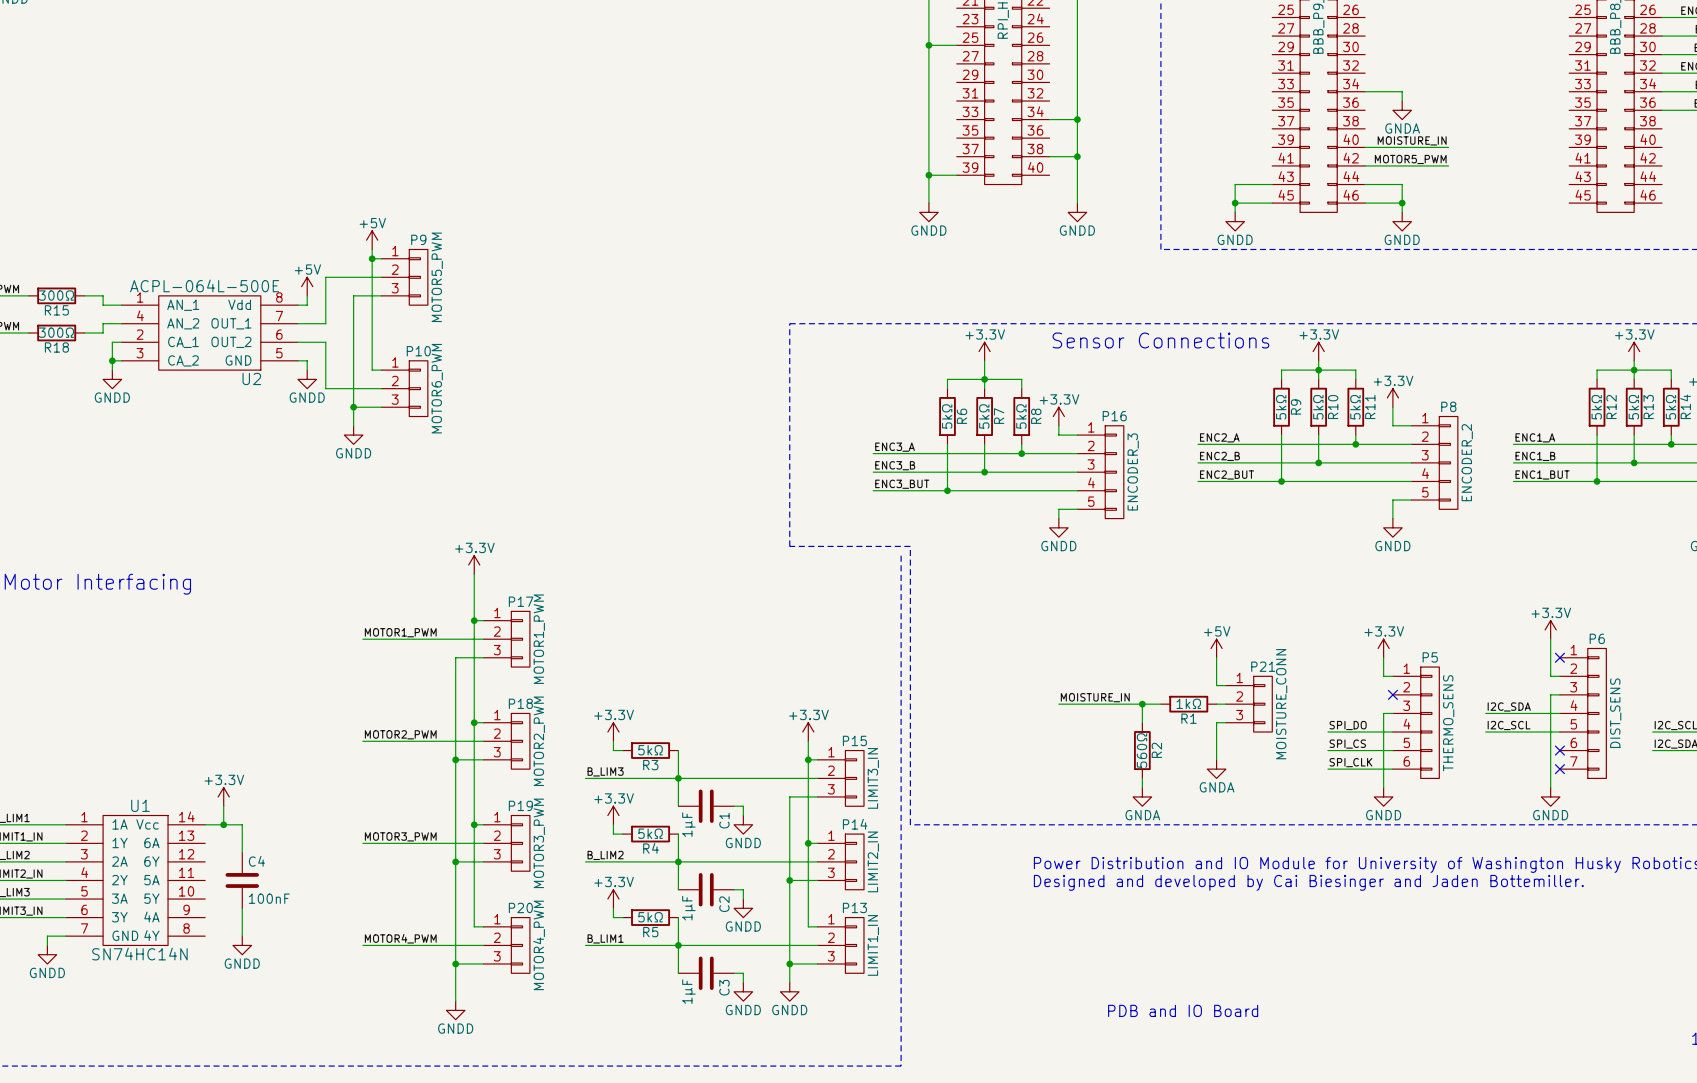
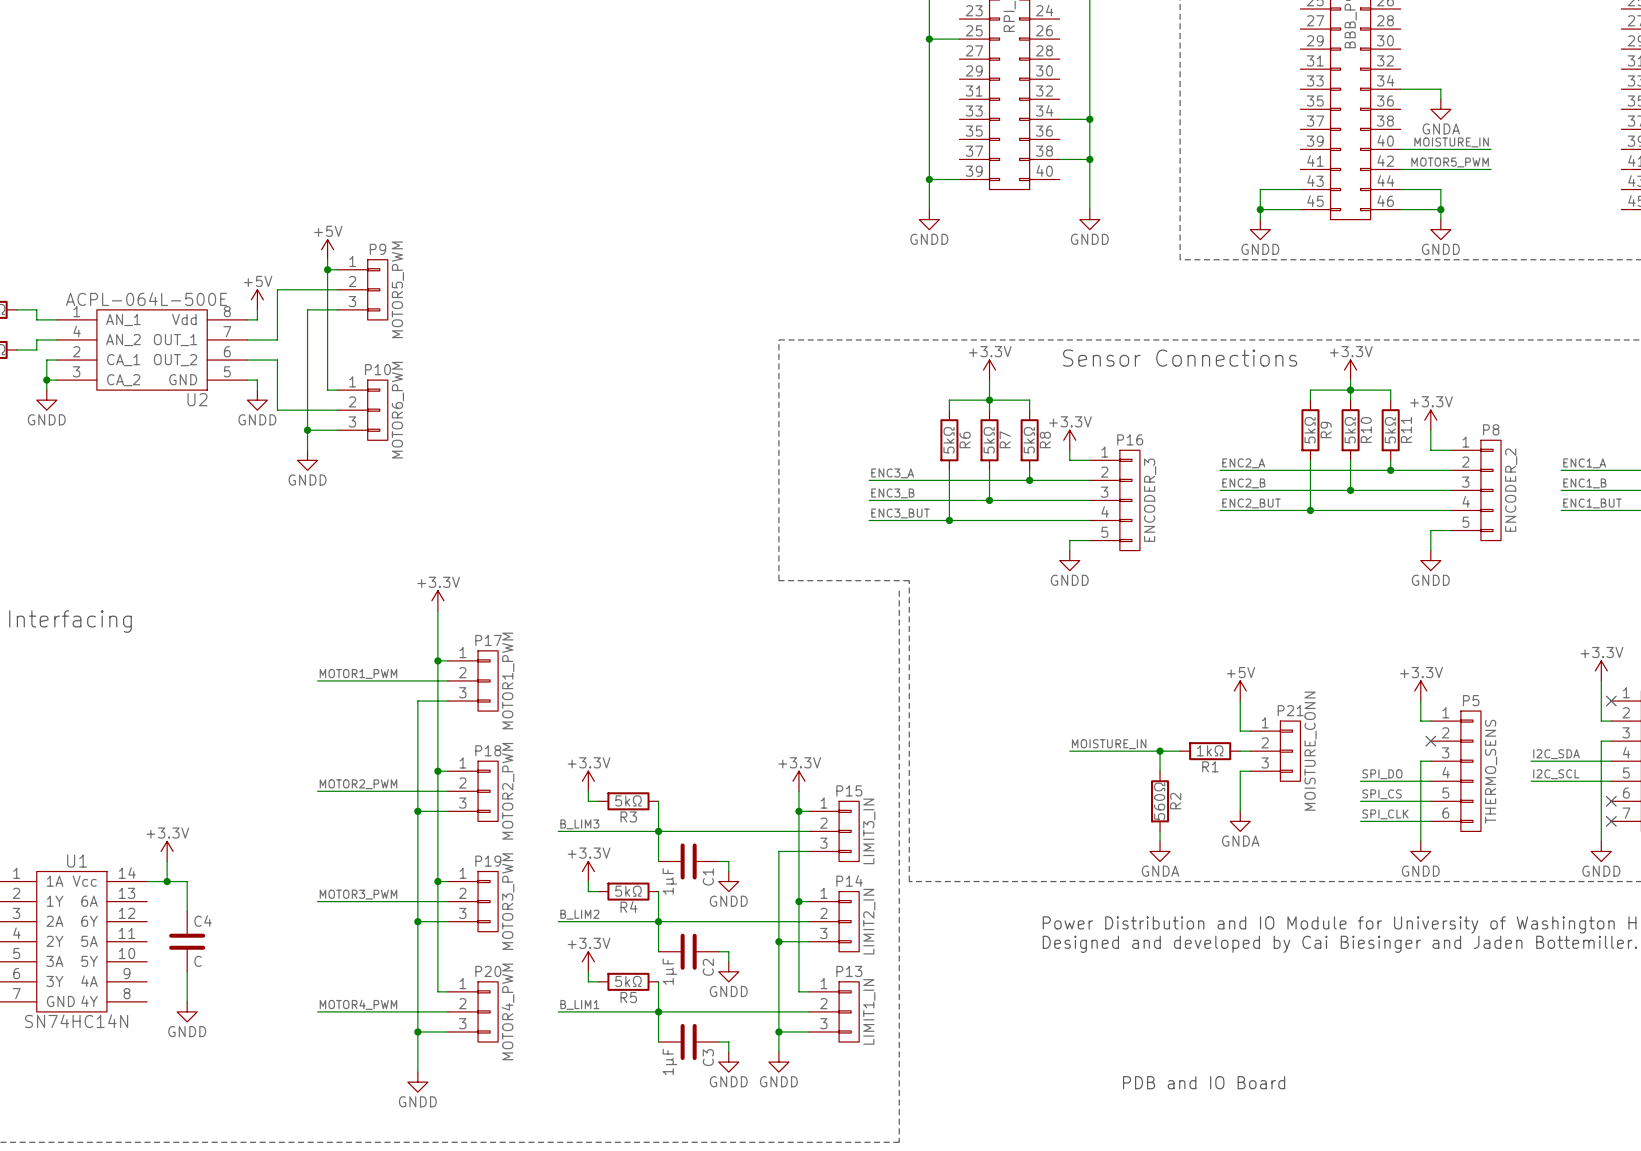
C4 value: 100nF (269, 898) -> C (198, 961)

